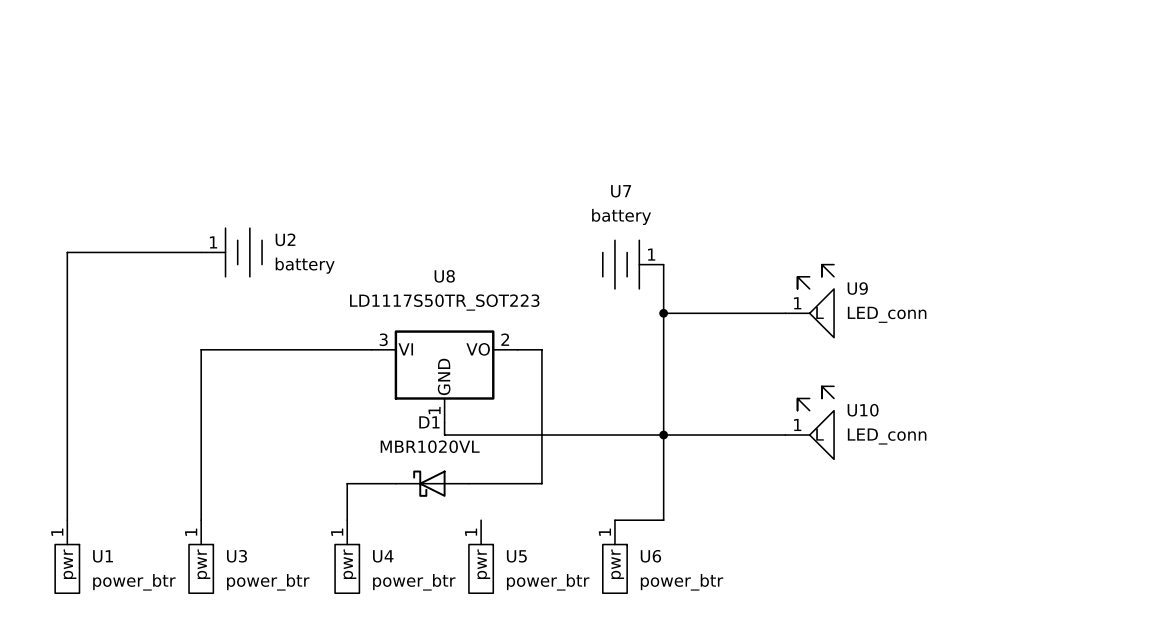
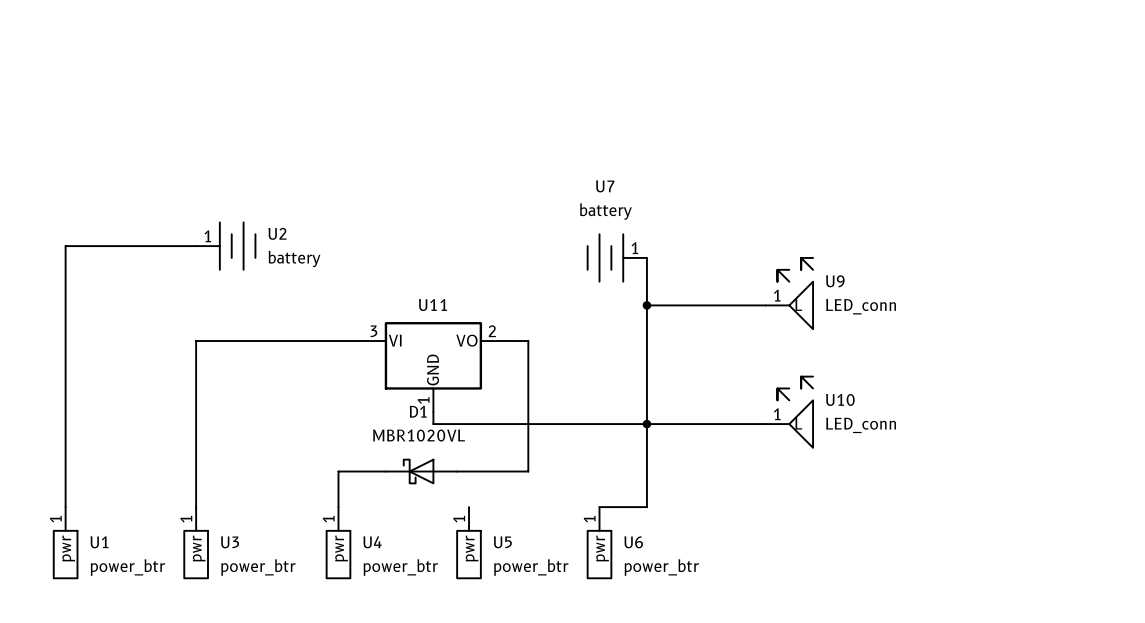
U8 name: U8 (444, 276) -> U11 (433, 305)
U8 value: LD1117S50TR_SOT223 (444, 302) -> none

